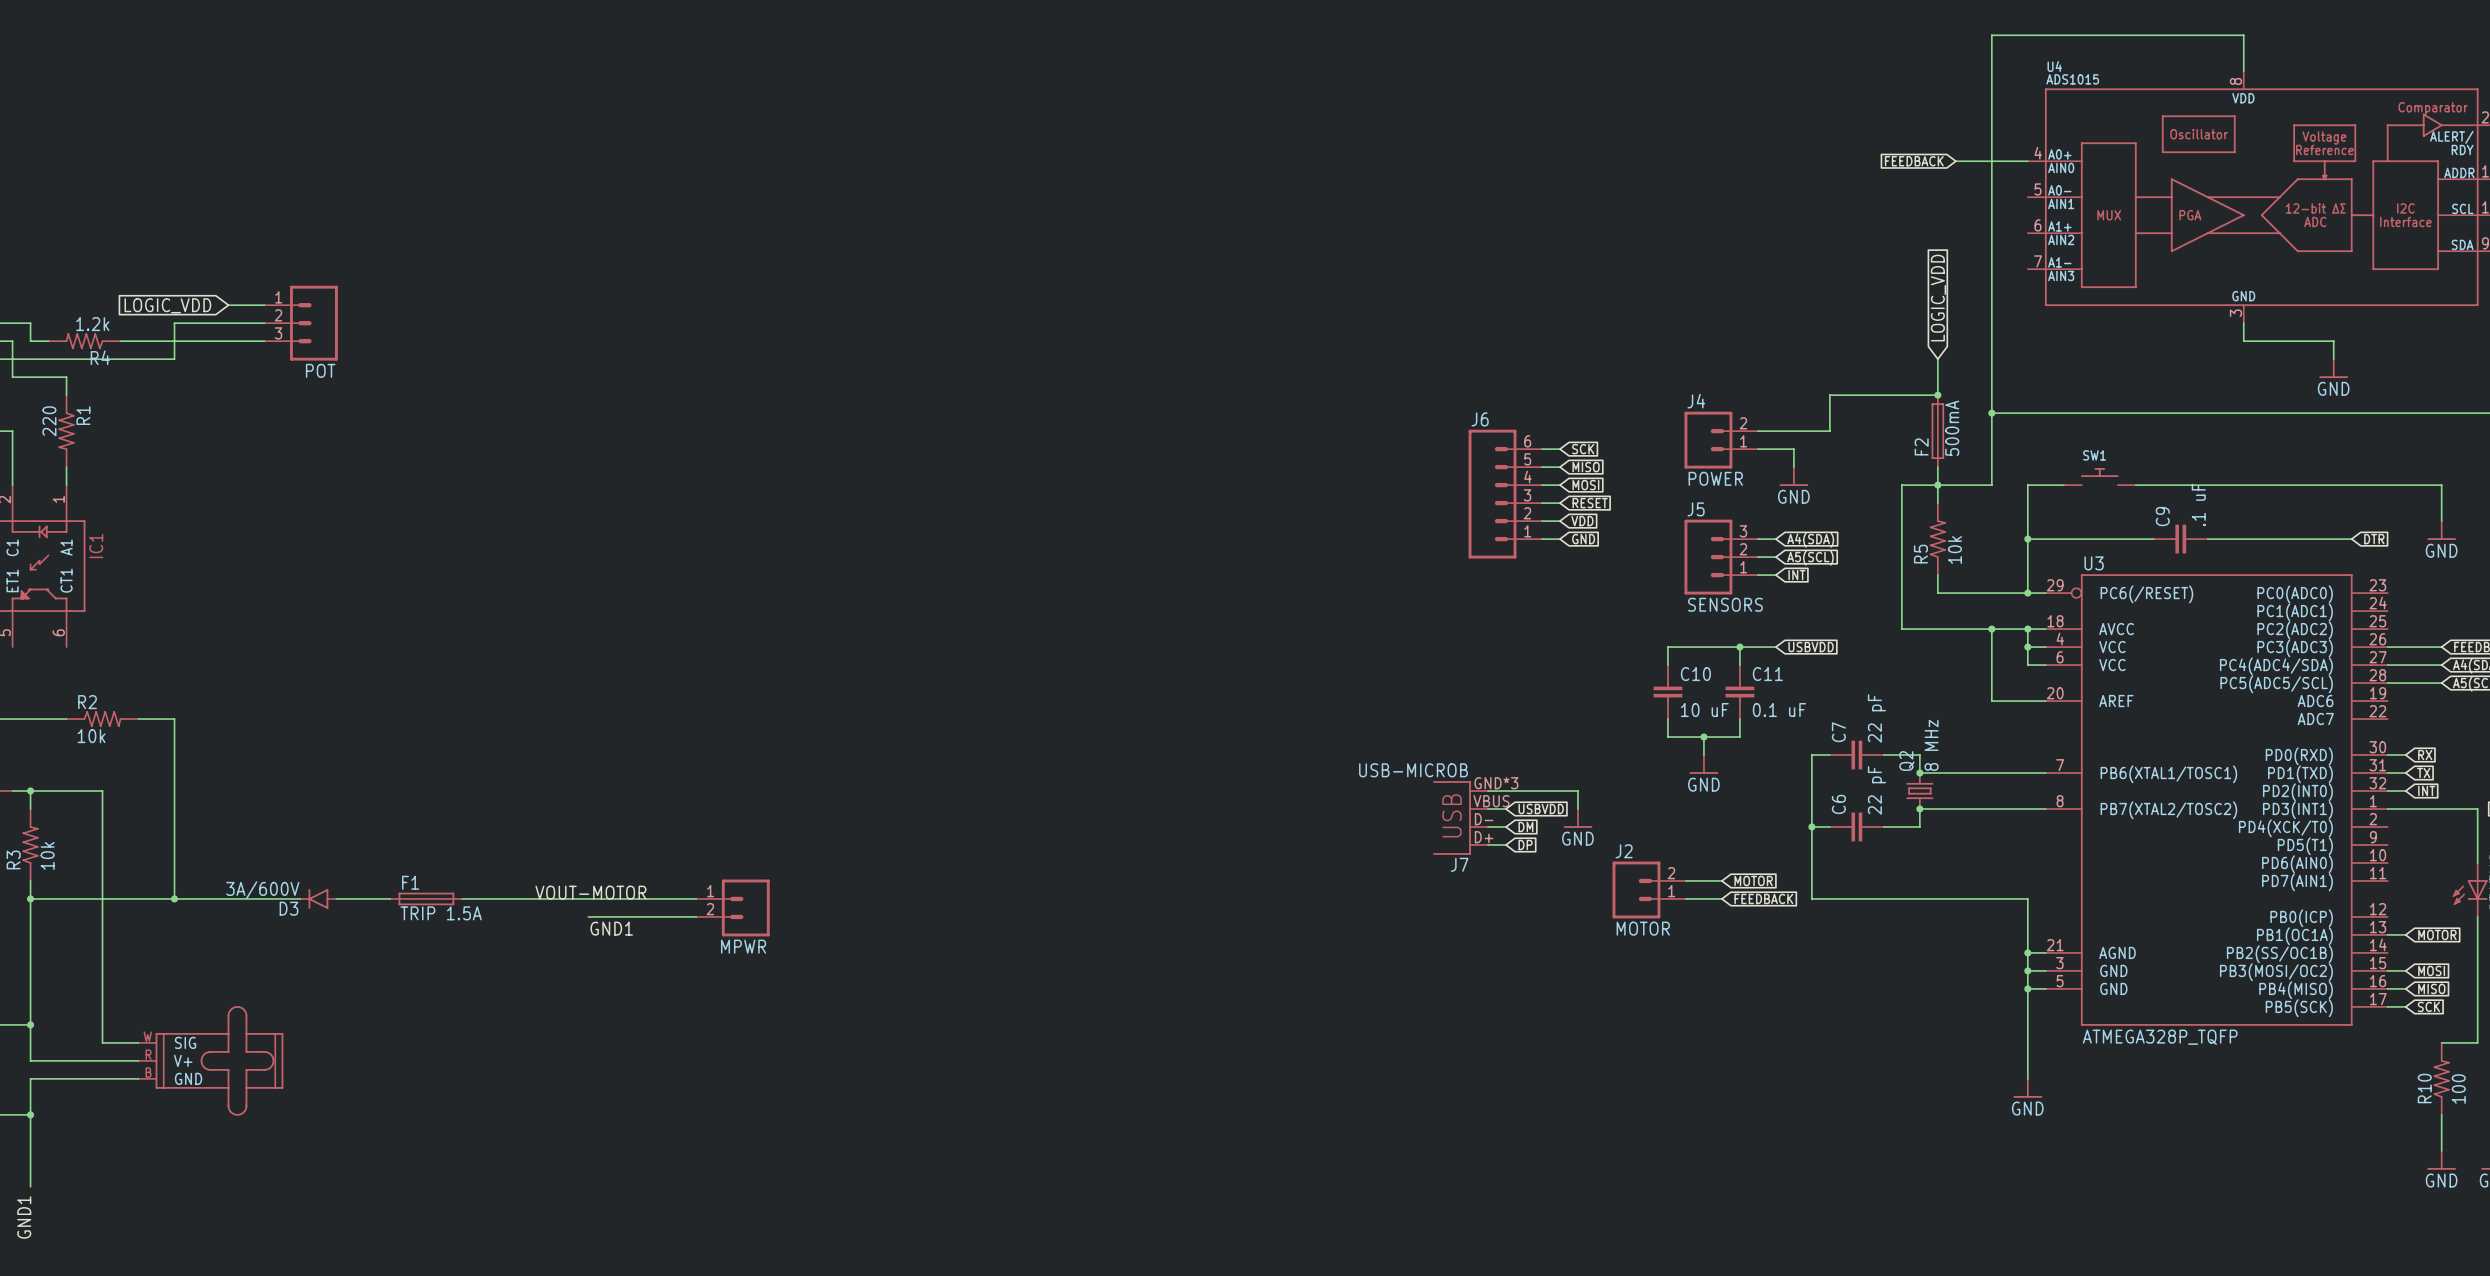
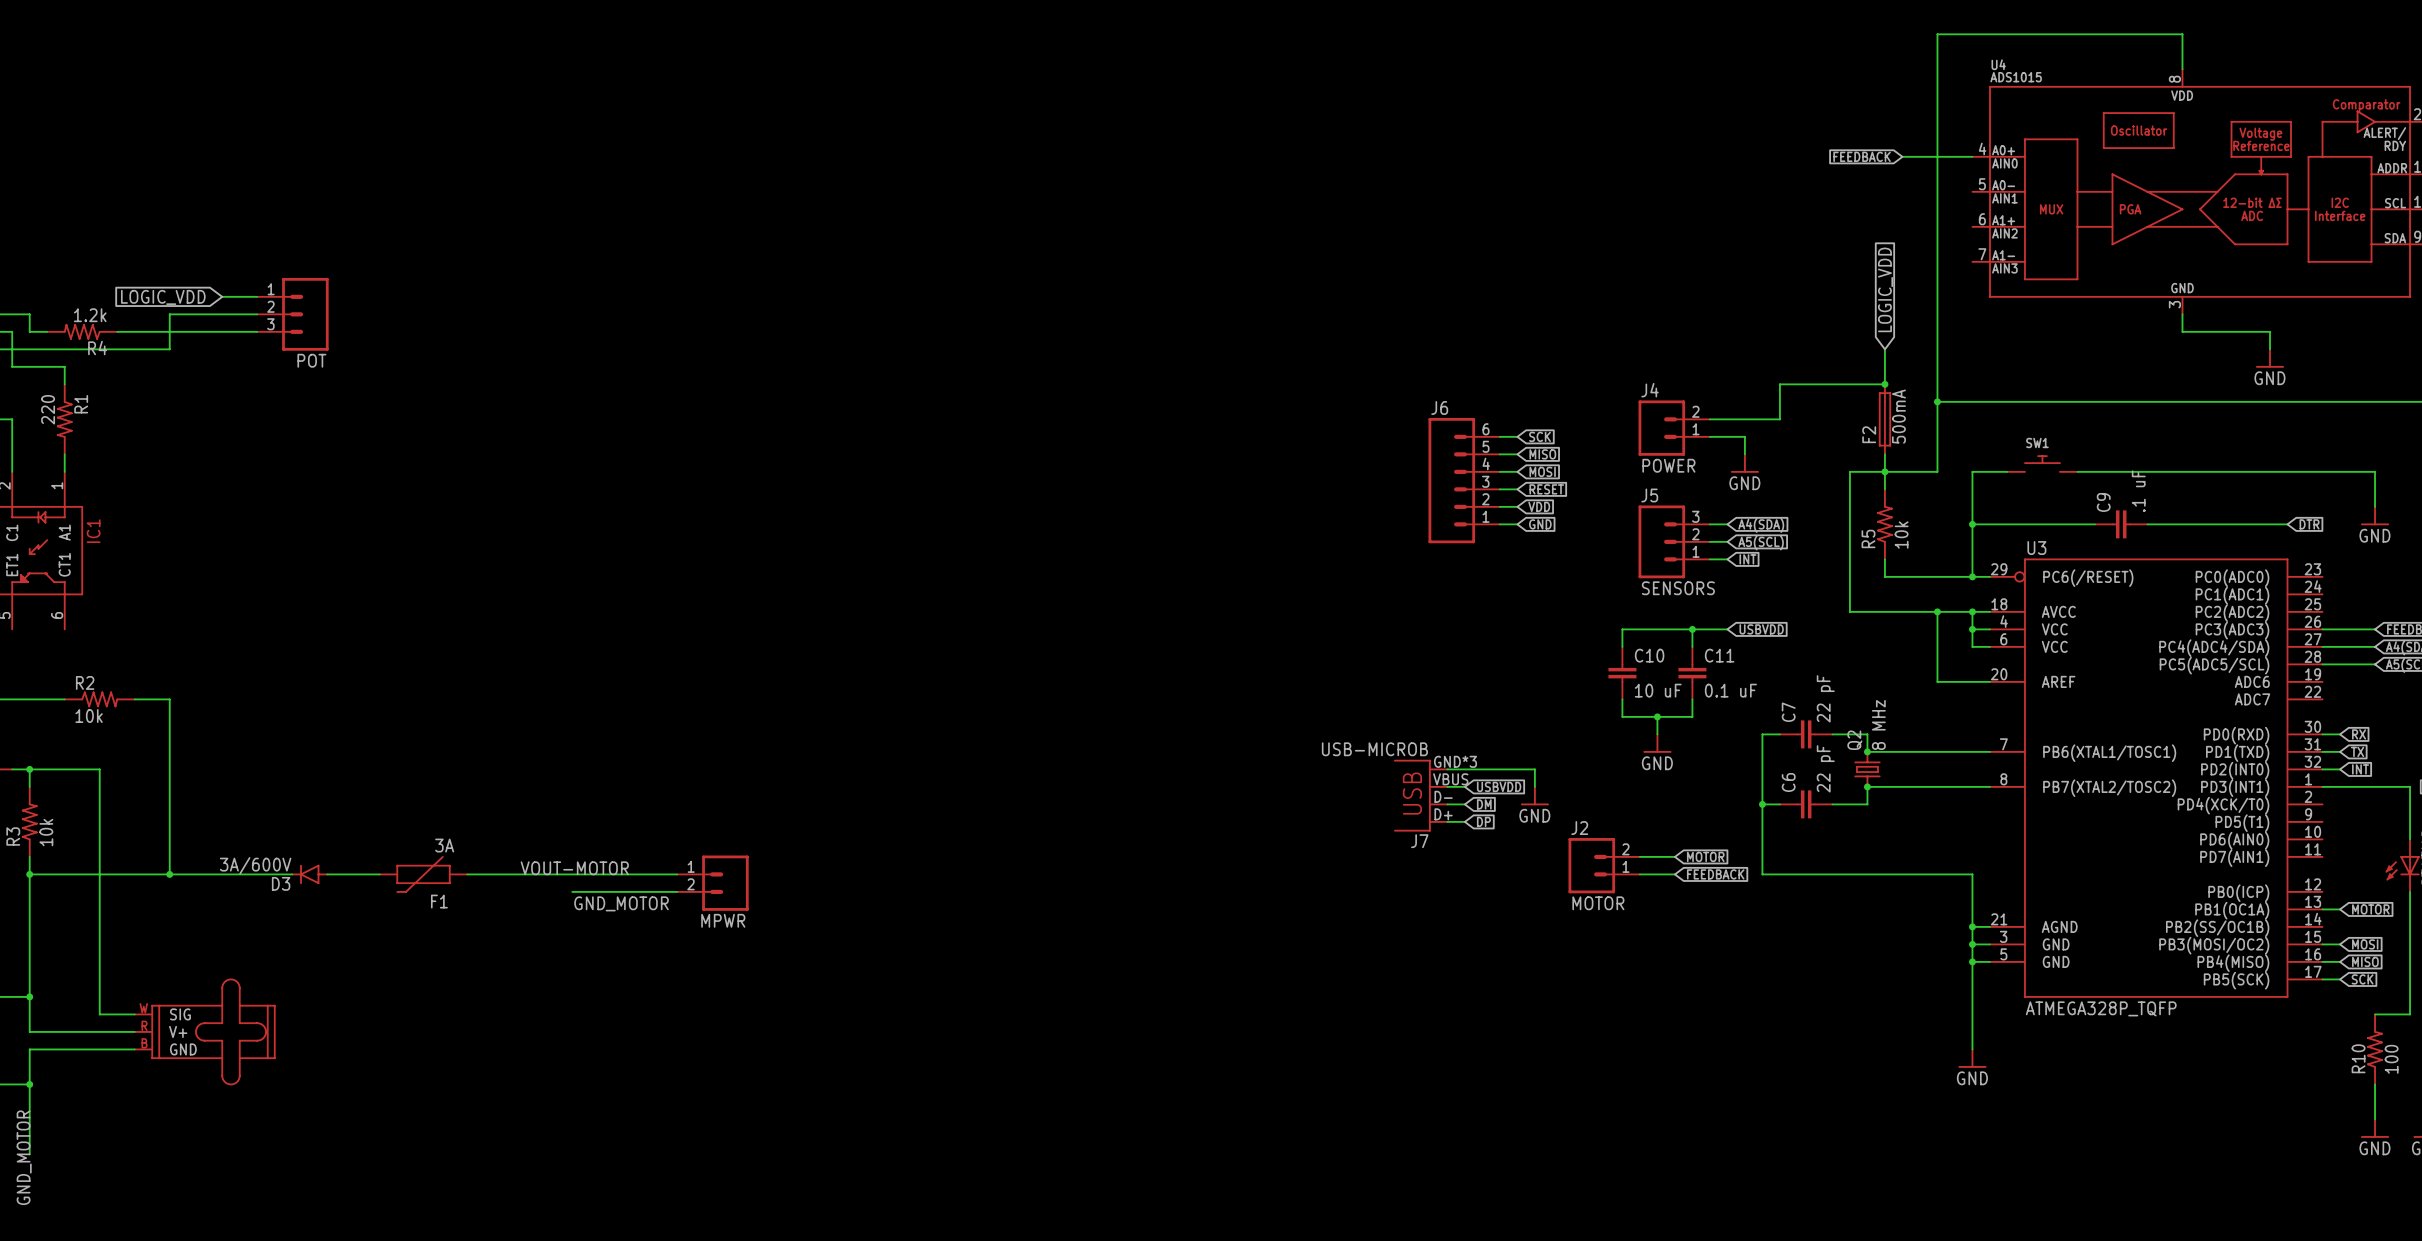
F1 name position: F1 (410, 882) -> F1 (439, 901)
F1 symbol: [390, 892, 463, 906] -> [379, 856, 468, 893]
F1 value: TRIP 1.5A (441, 913) -> 3A (444, 845)
label: GND1 (611, 928) -> GND_MOTOR (621, 903)
label: GND1 (24, 1217) -> GND_MOTOR (24, 1157)

